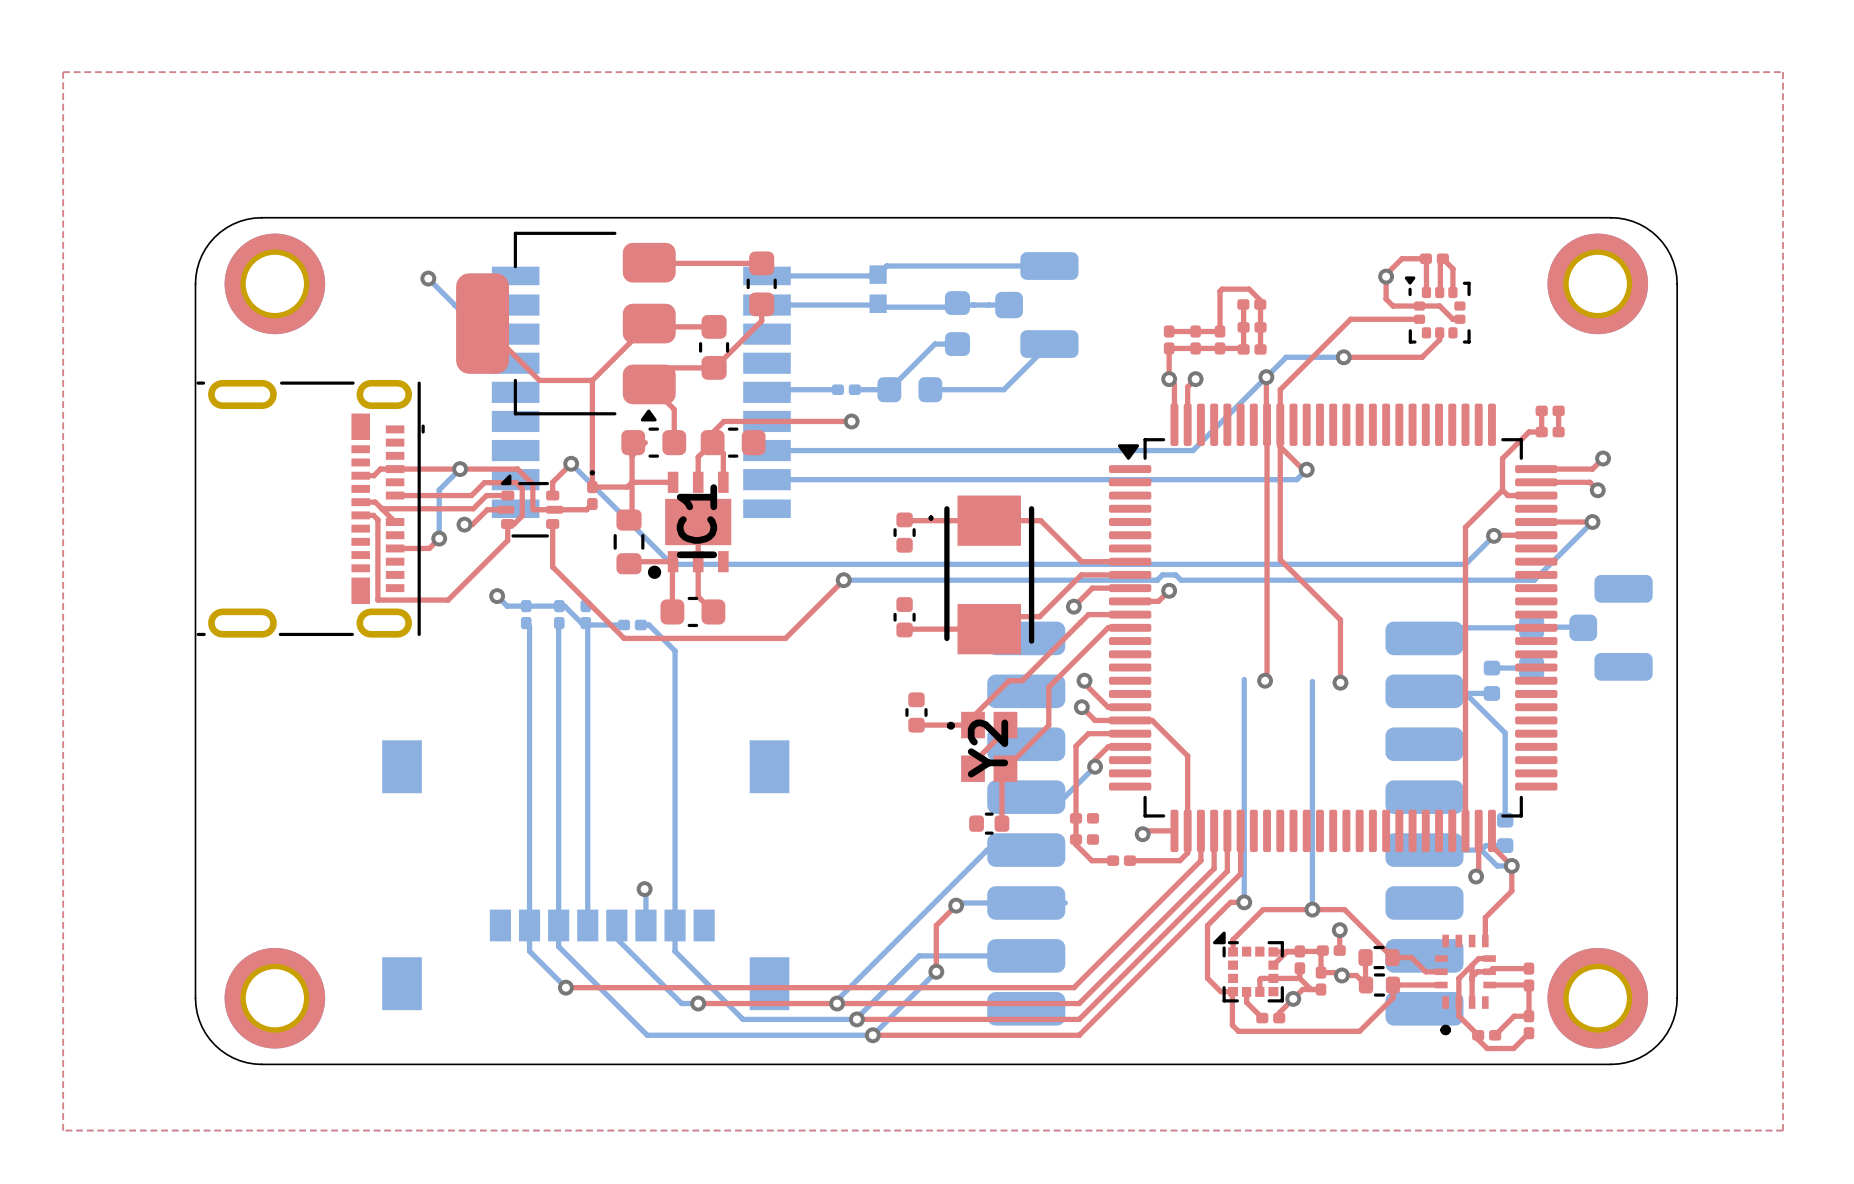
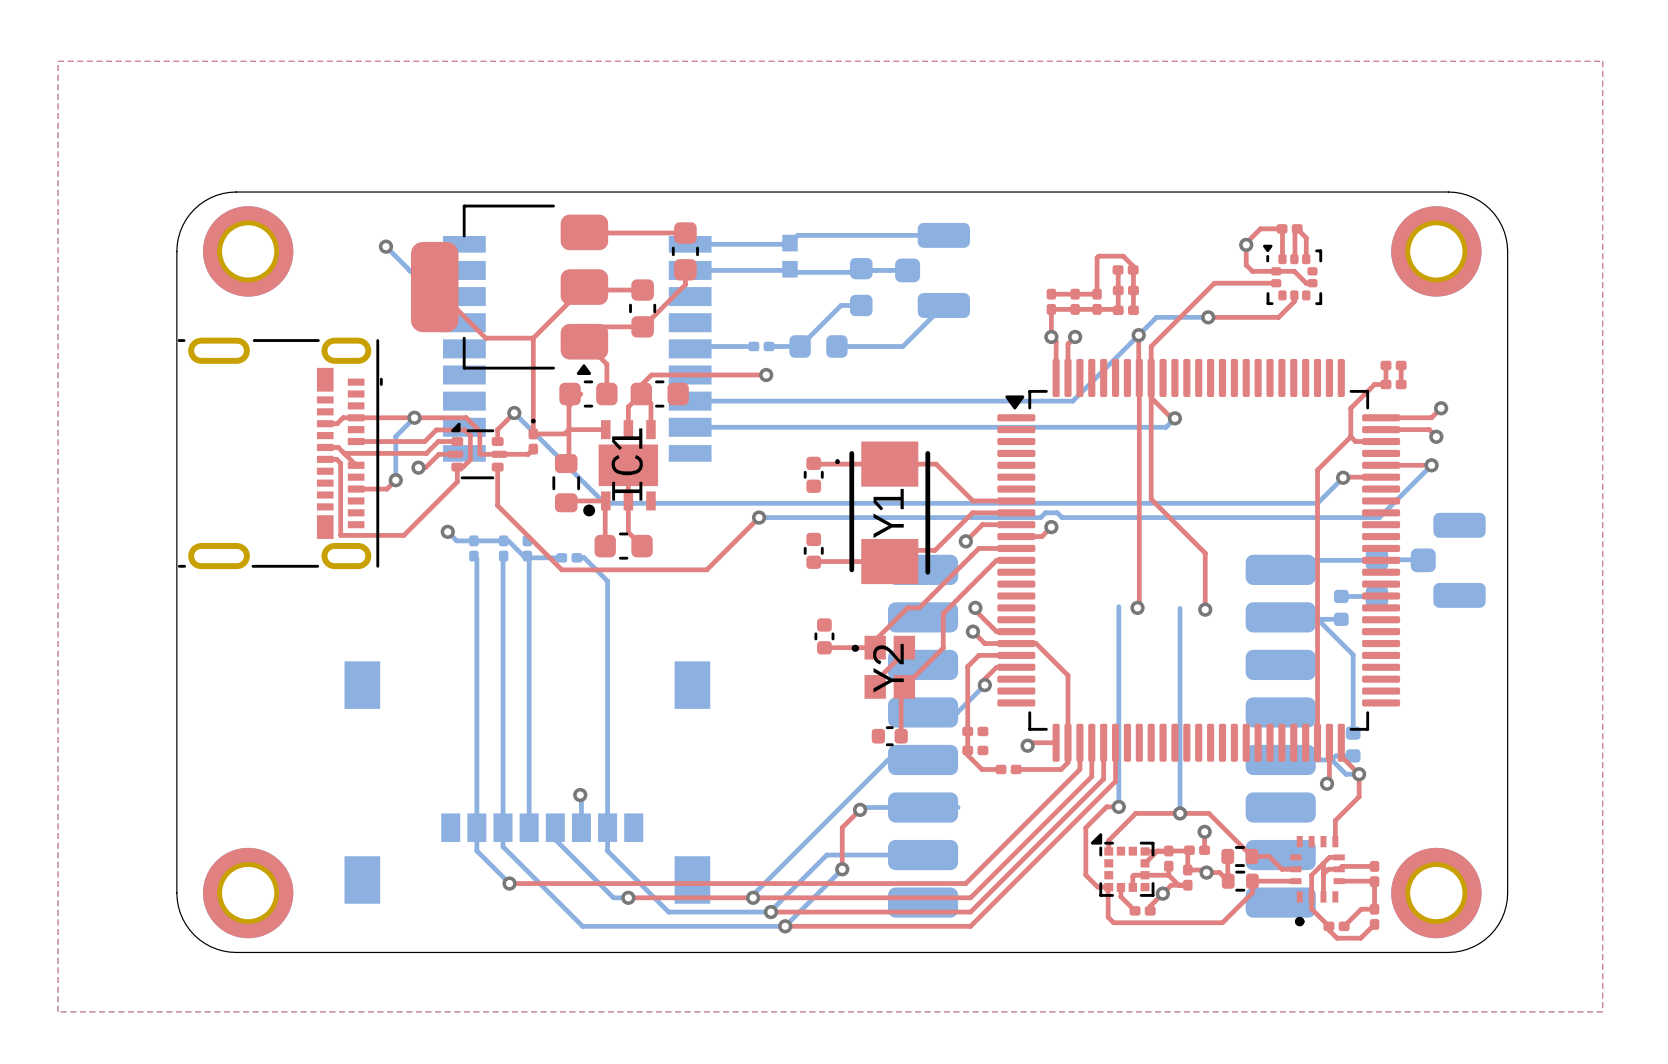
Y1 name: none -> Y1 (888, 513)

